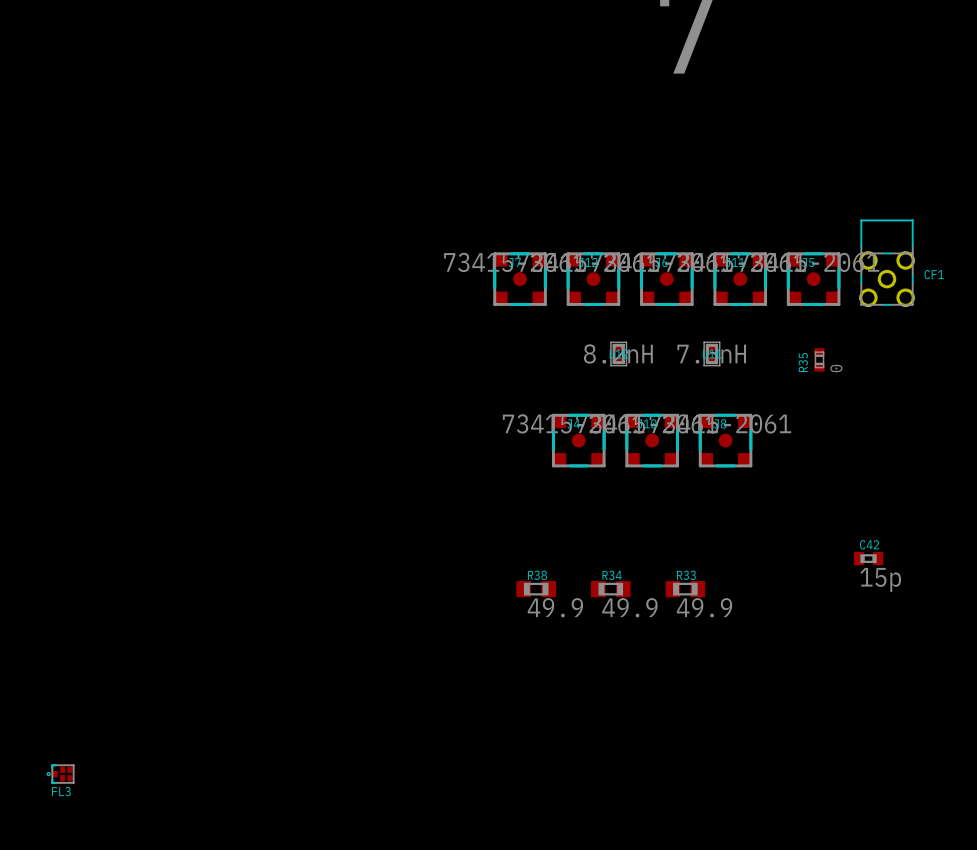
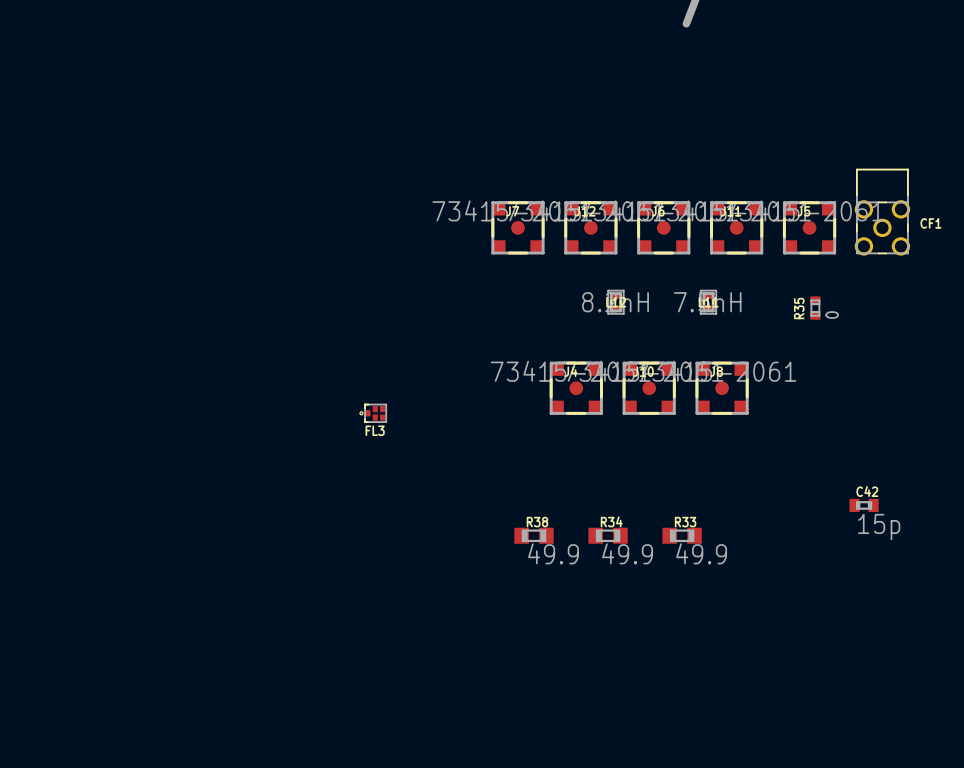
FL3 position: (60, 774) -> (373, 413)

